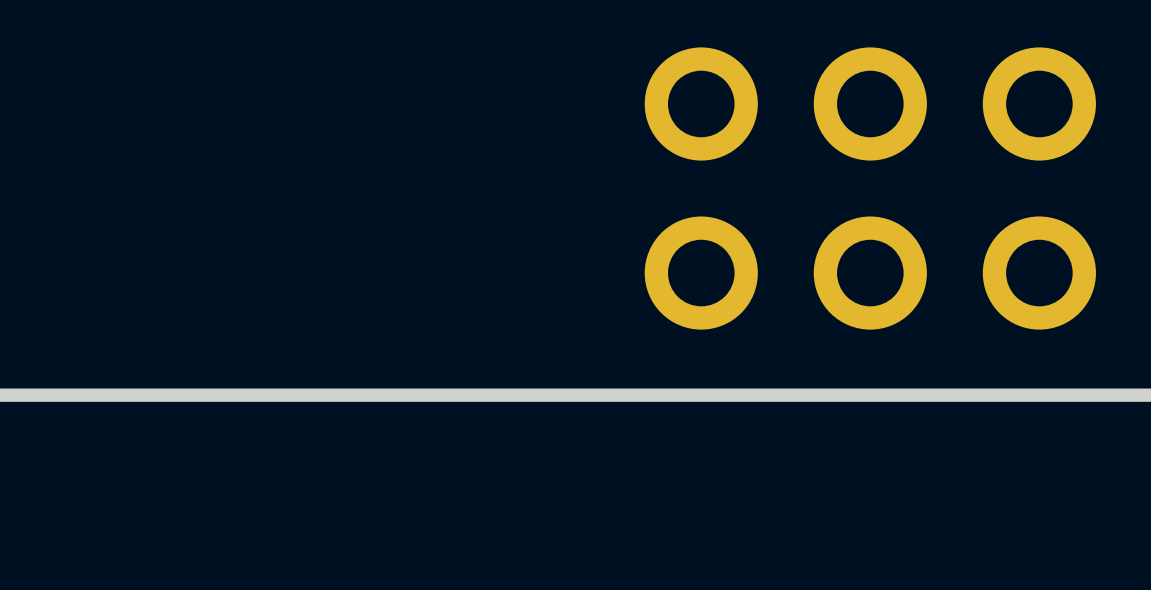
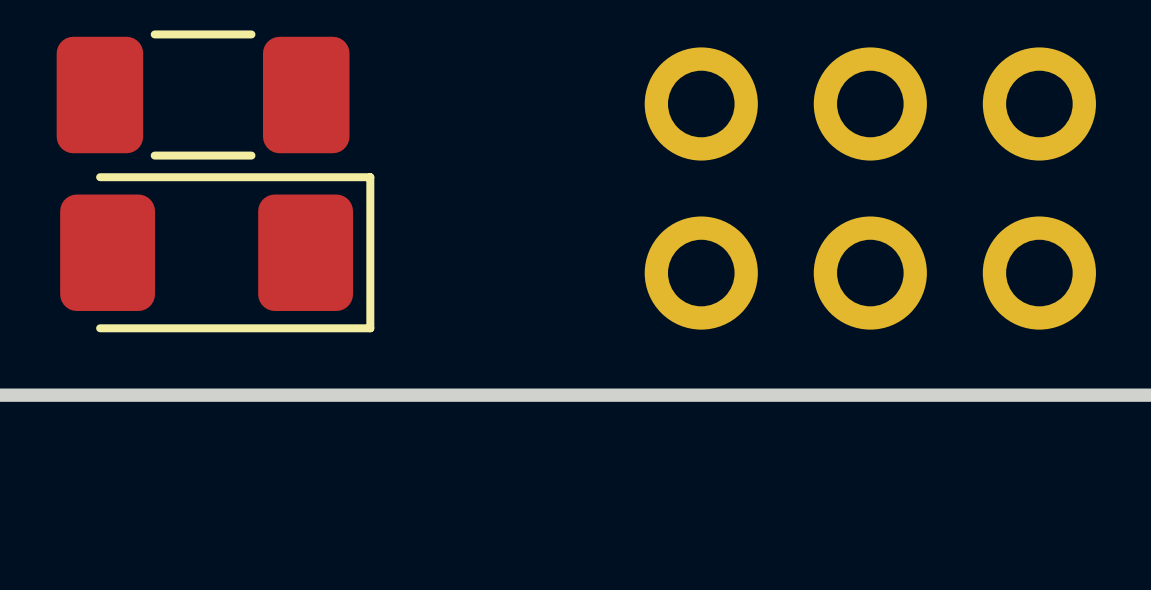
part: none -> (203, 95)
part: none -> (217, 252)

